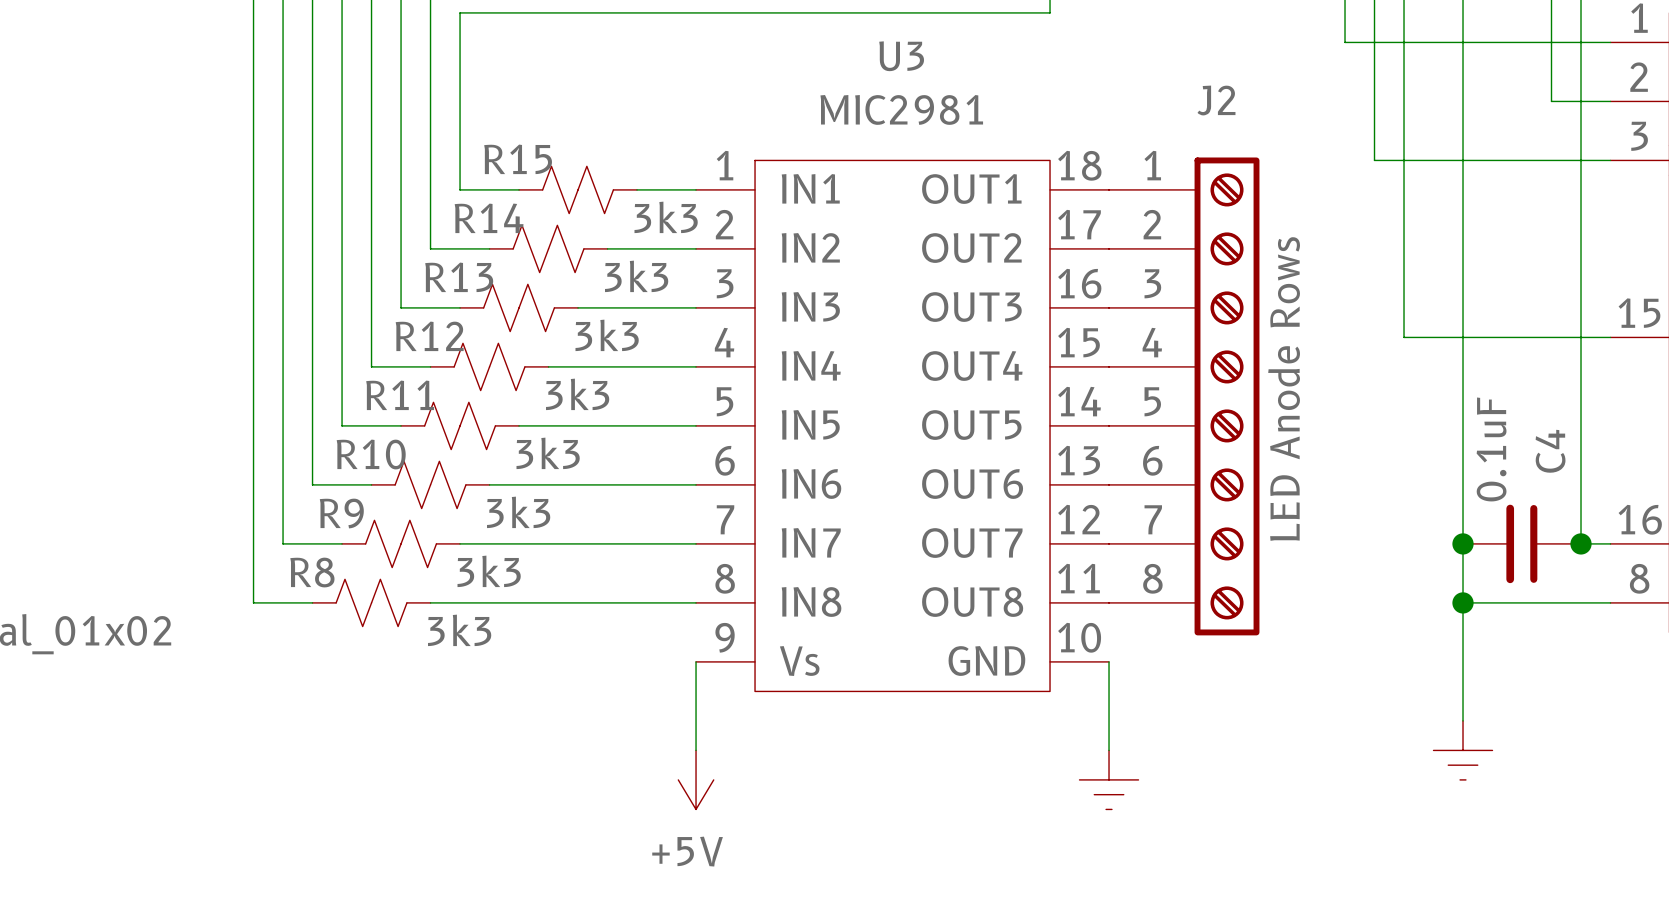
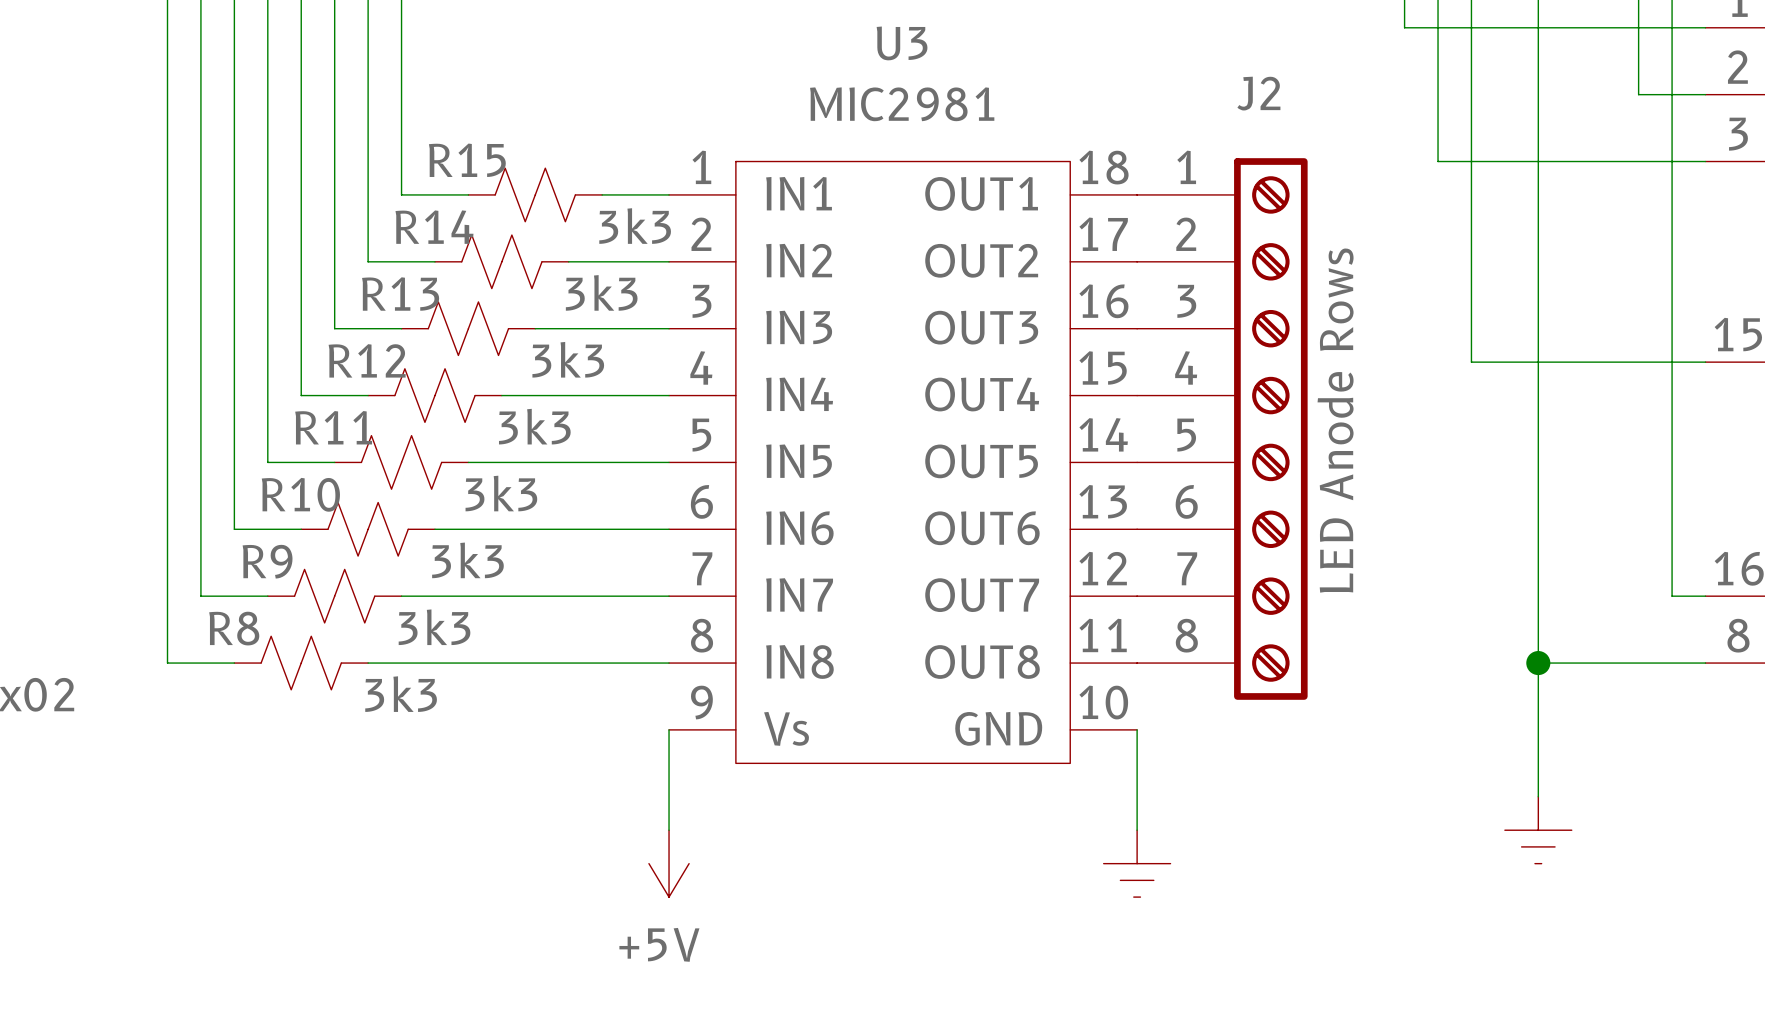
junction: (1463, 543) -> none
C4: 0.1uF (1522, 543) -> none
junction: (1581, 543) -> none

